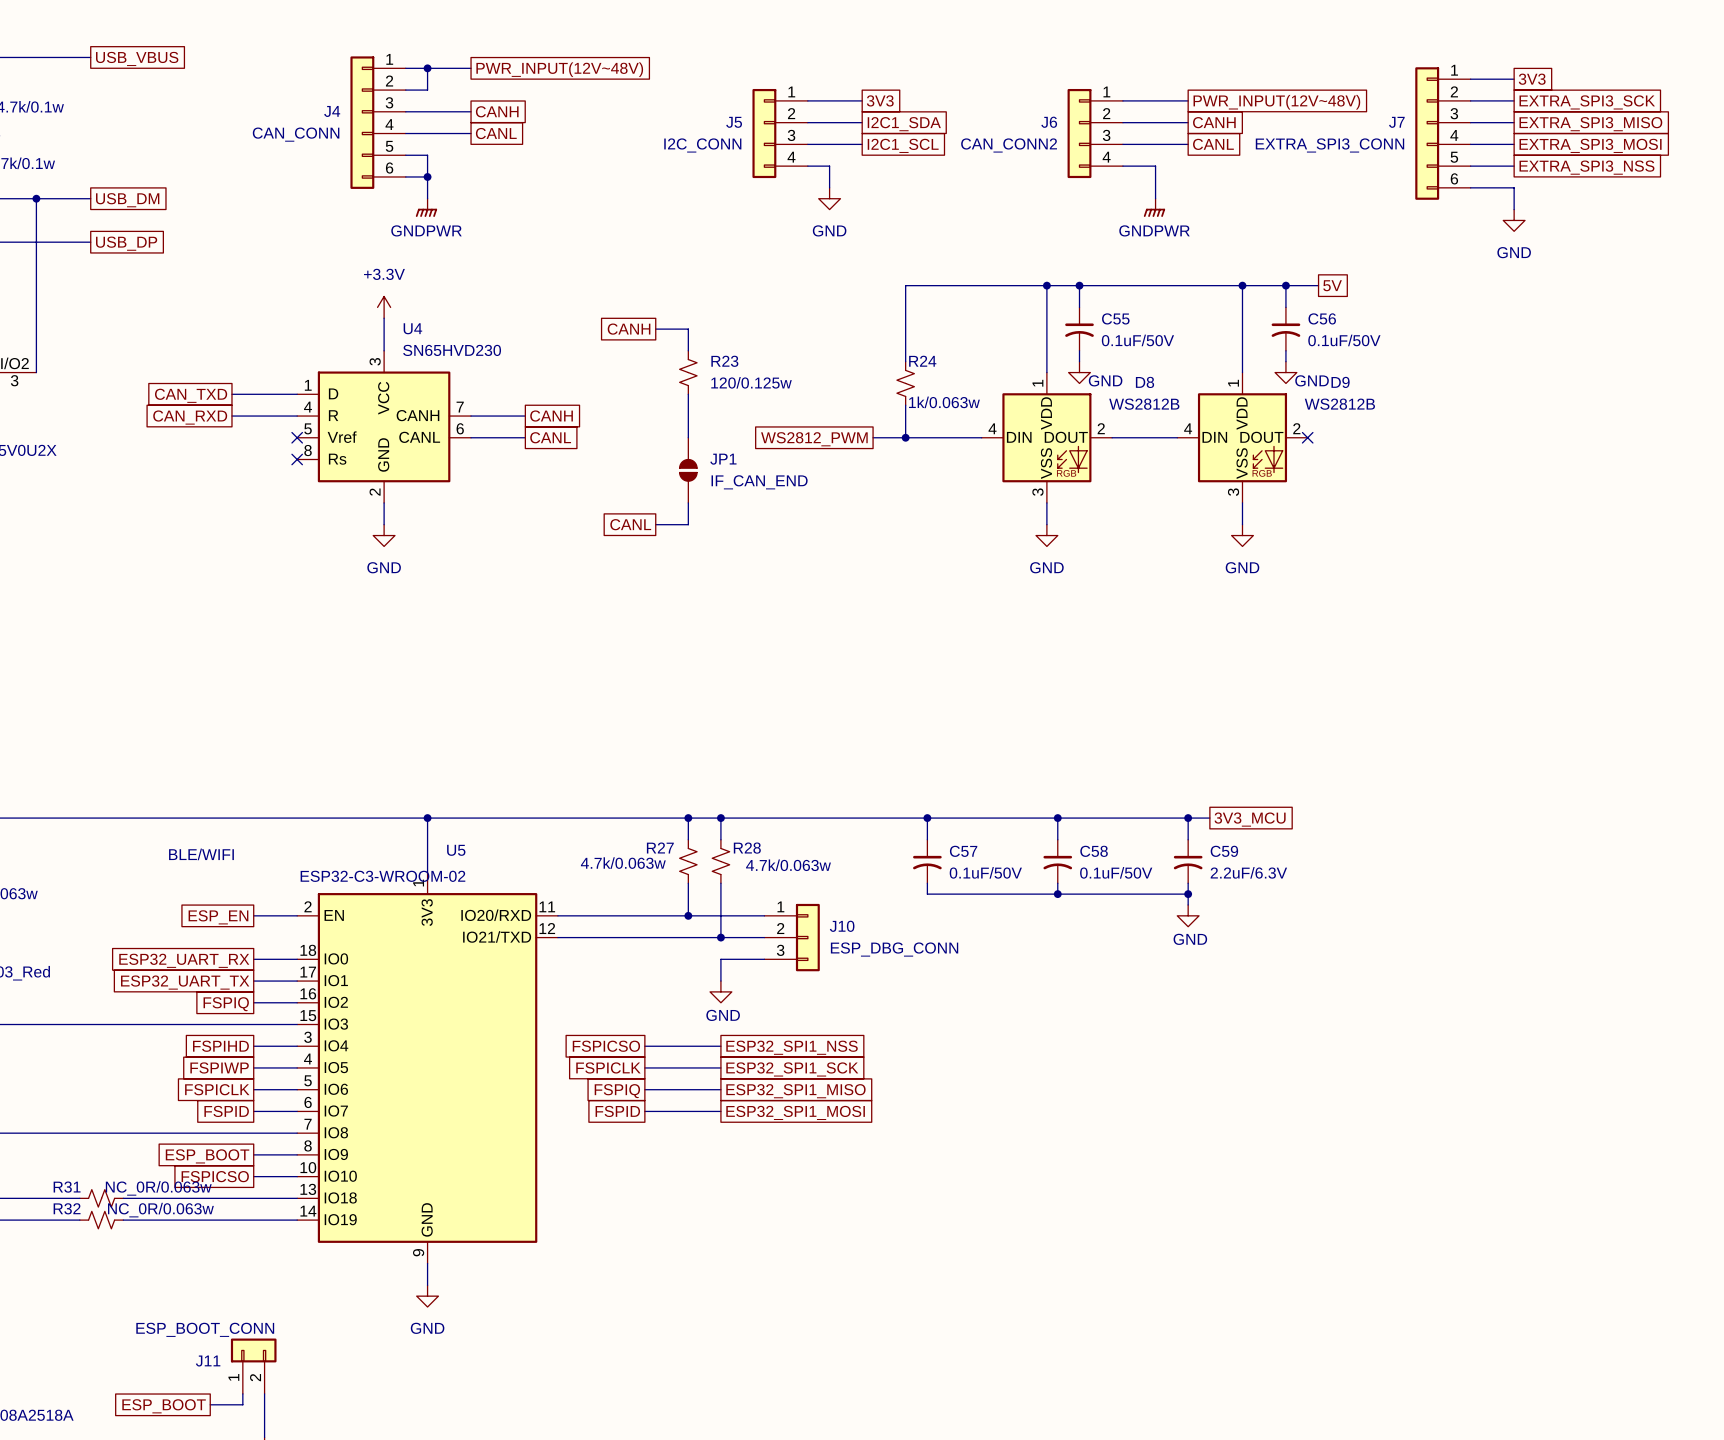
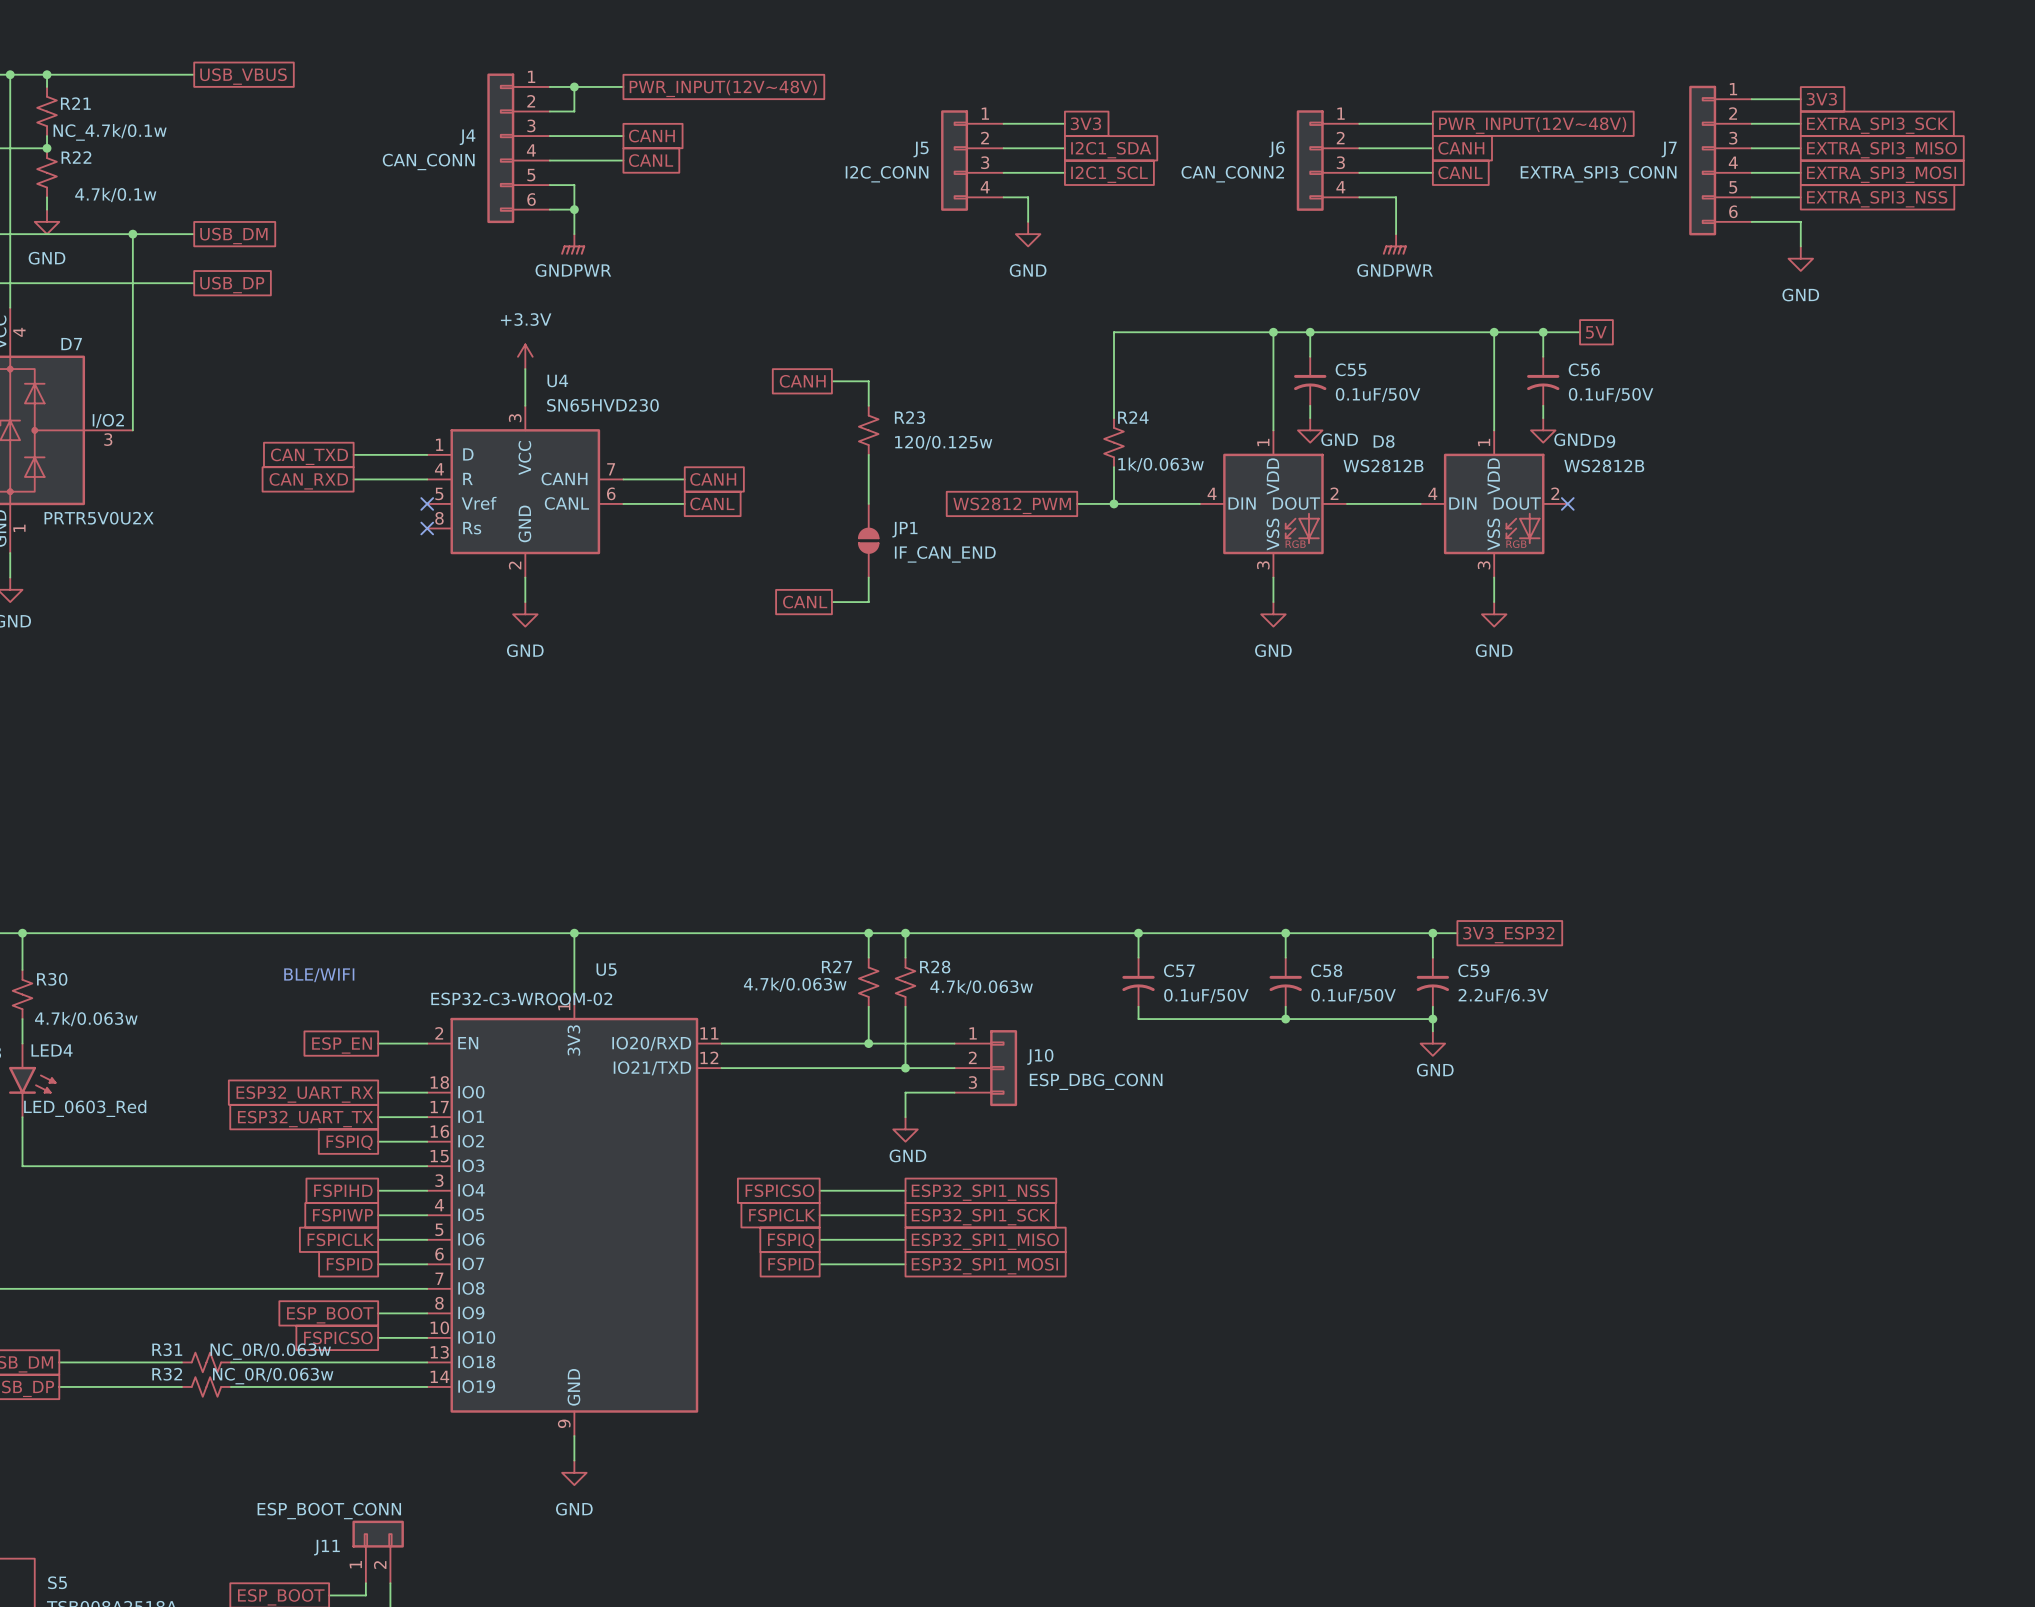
global label: 3V3_MCU (1250, 819) -> 3V3_ESP32 (1508, 935)

